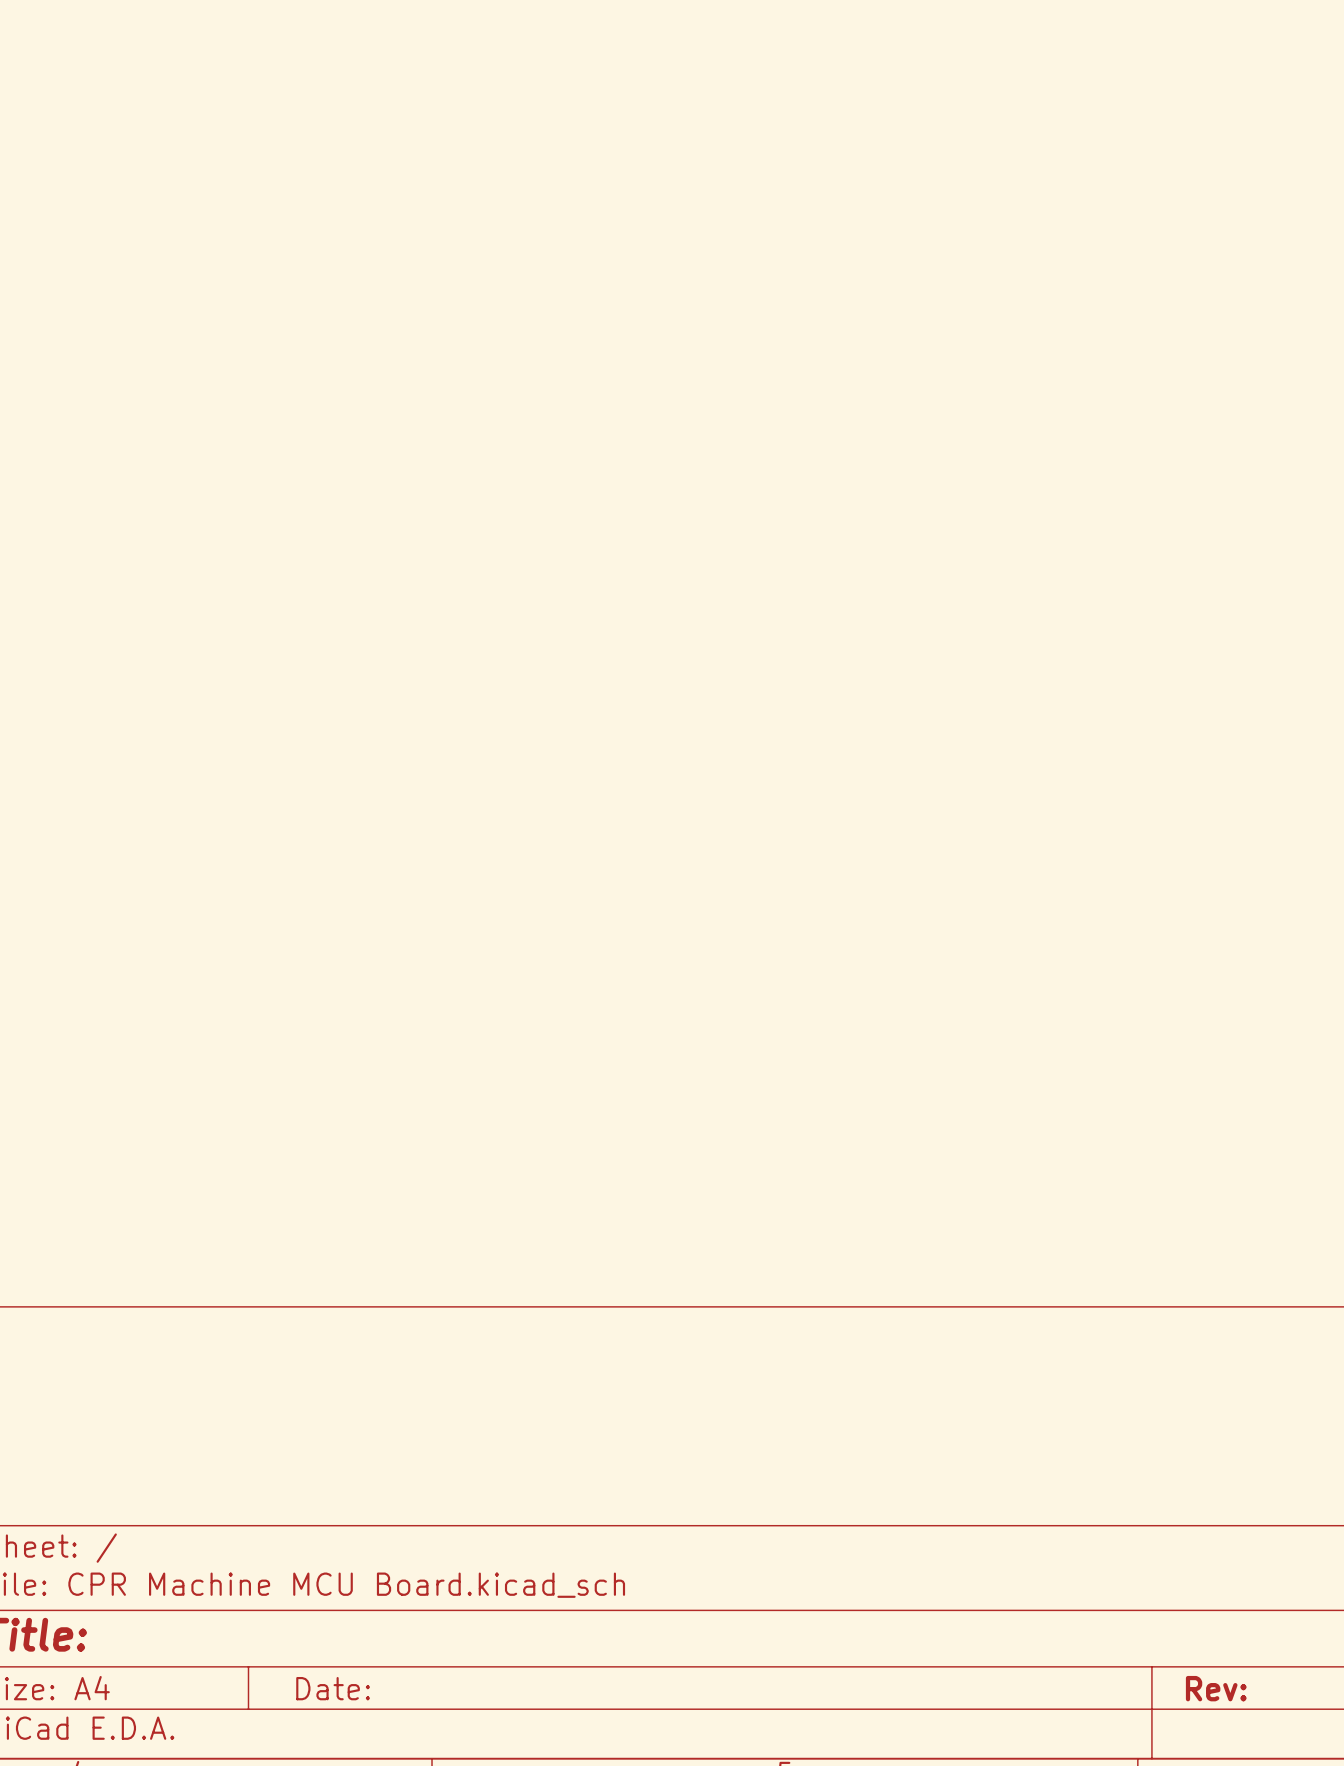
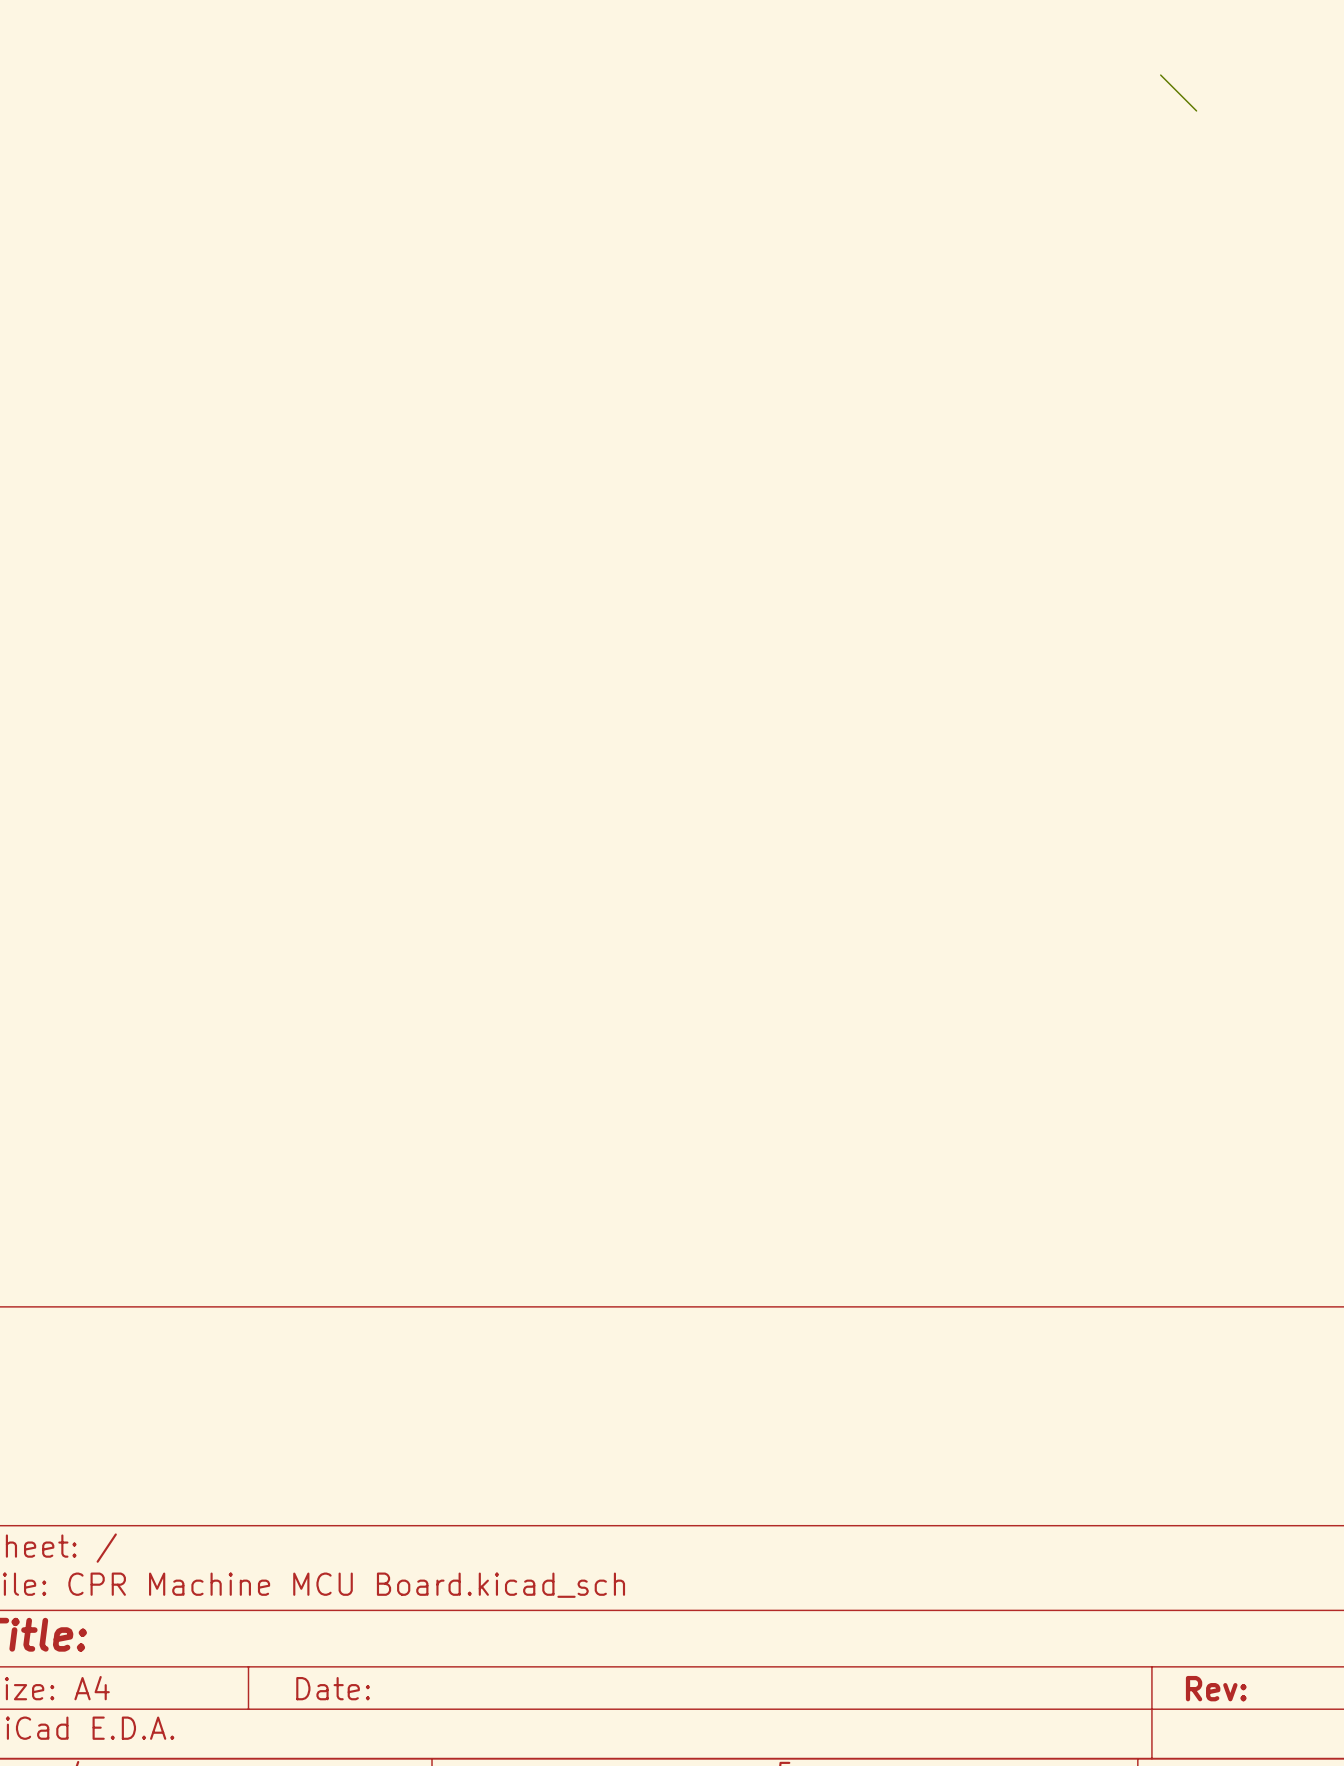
wire: none -> (1160, 75) (1196, 110)

